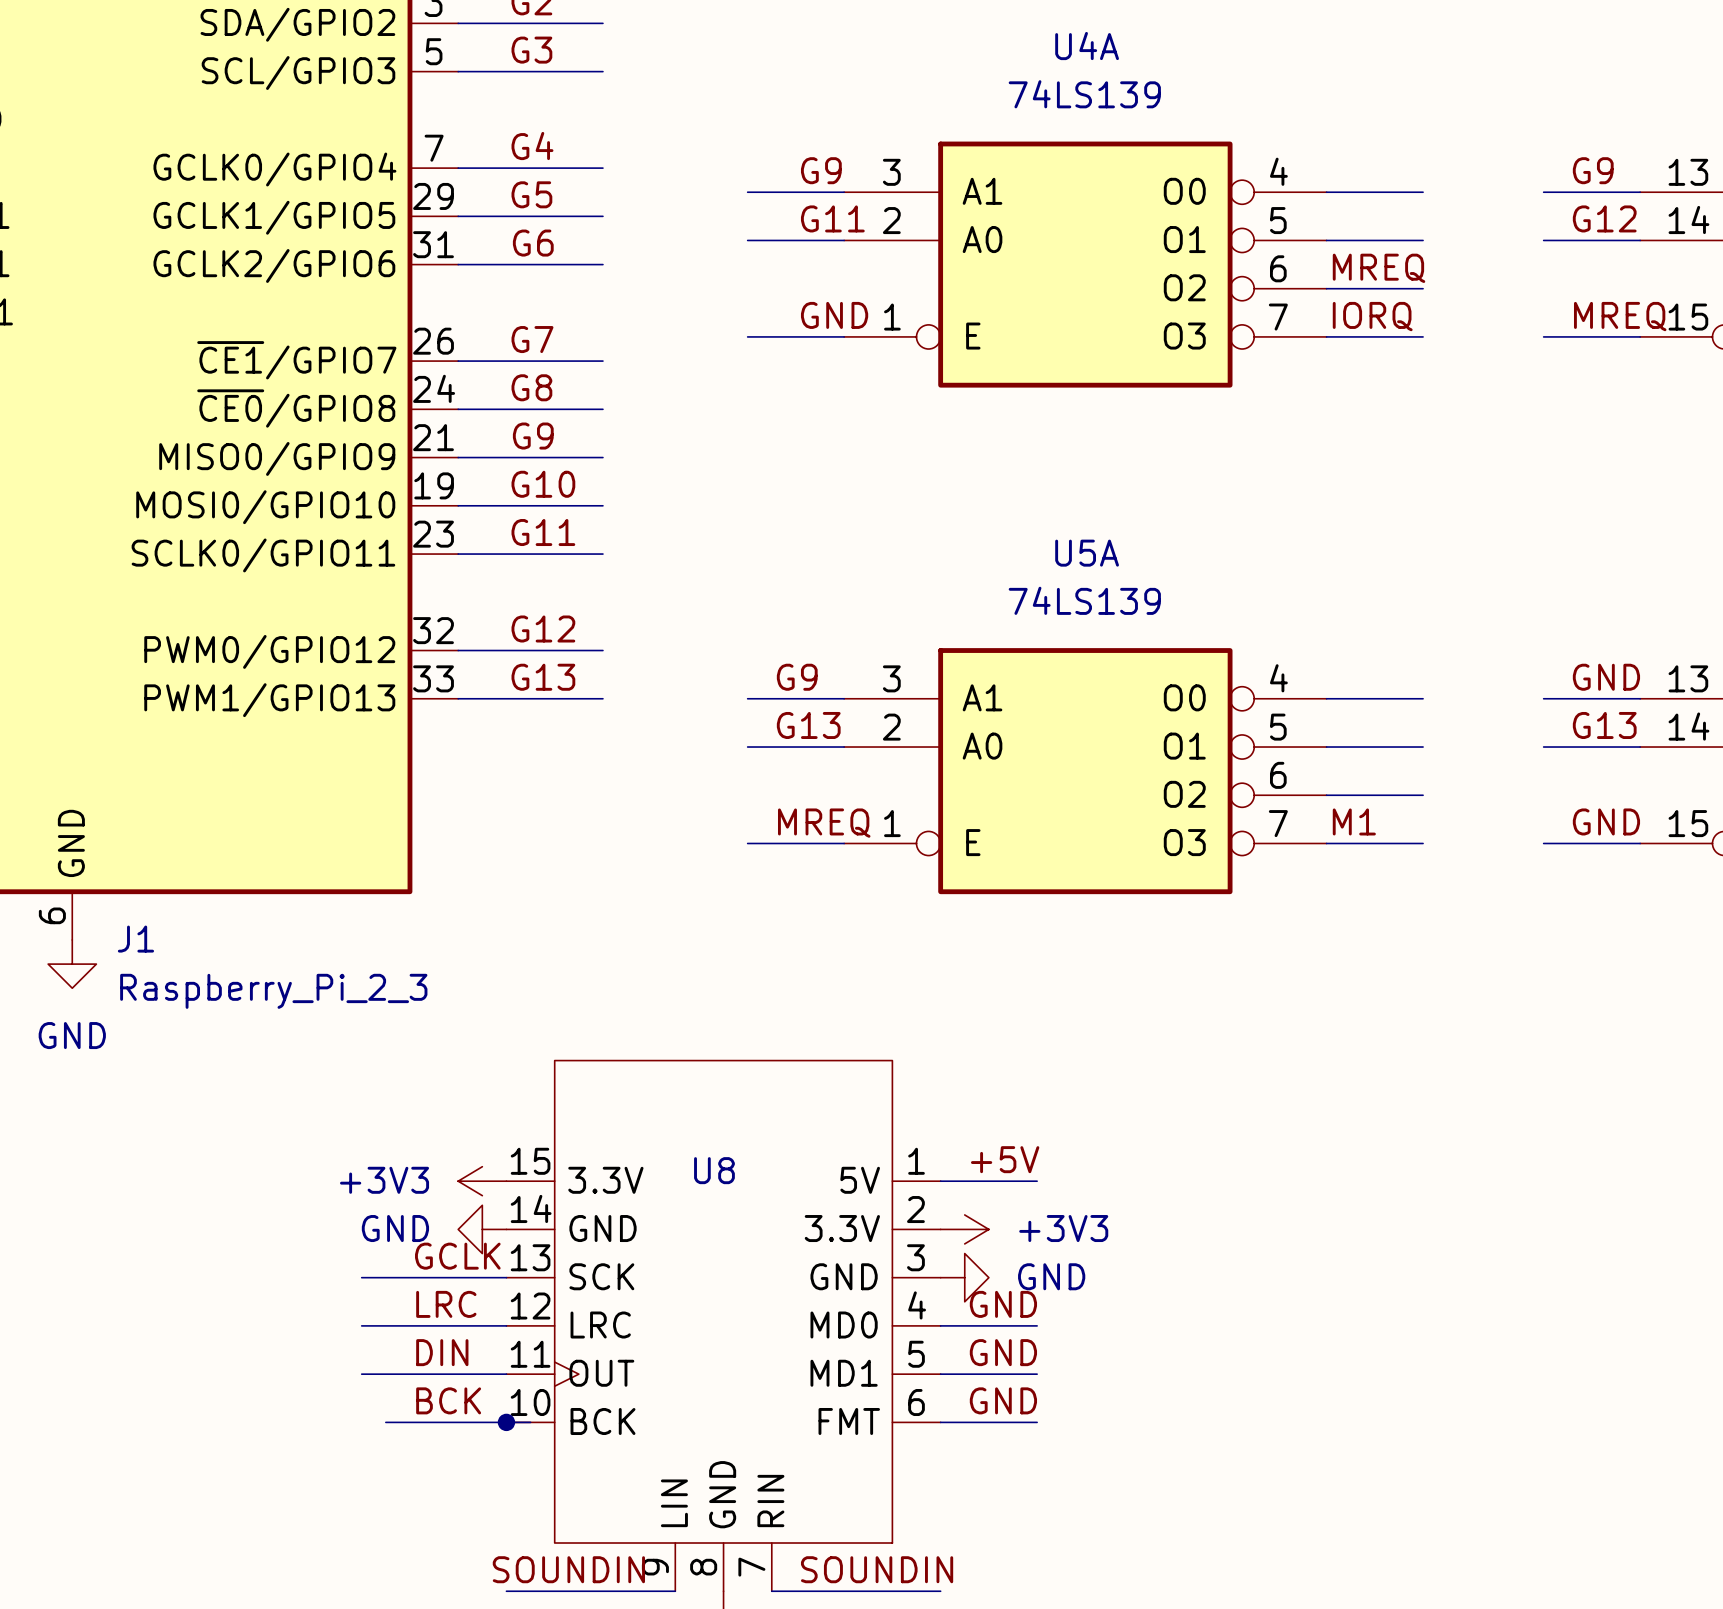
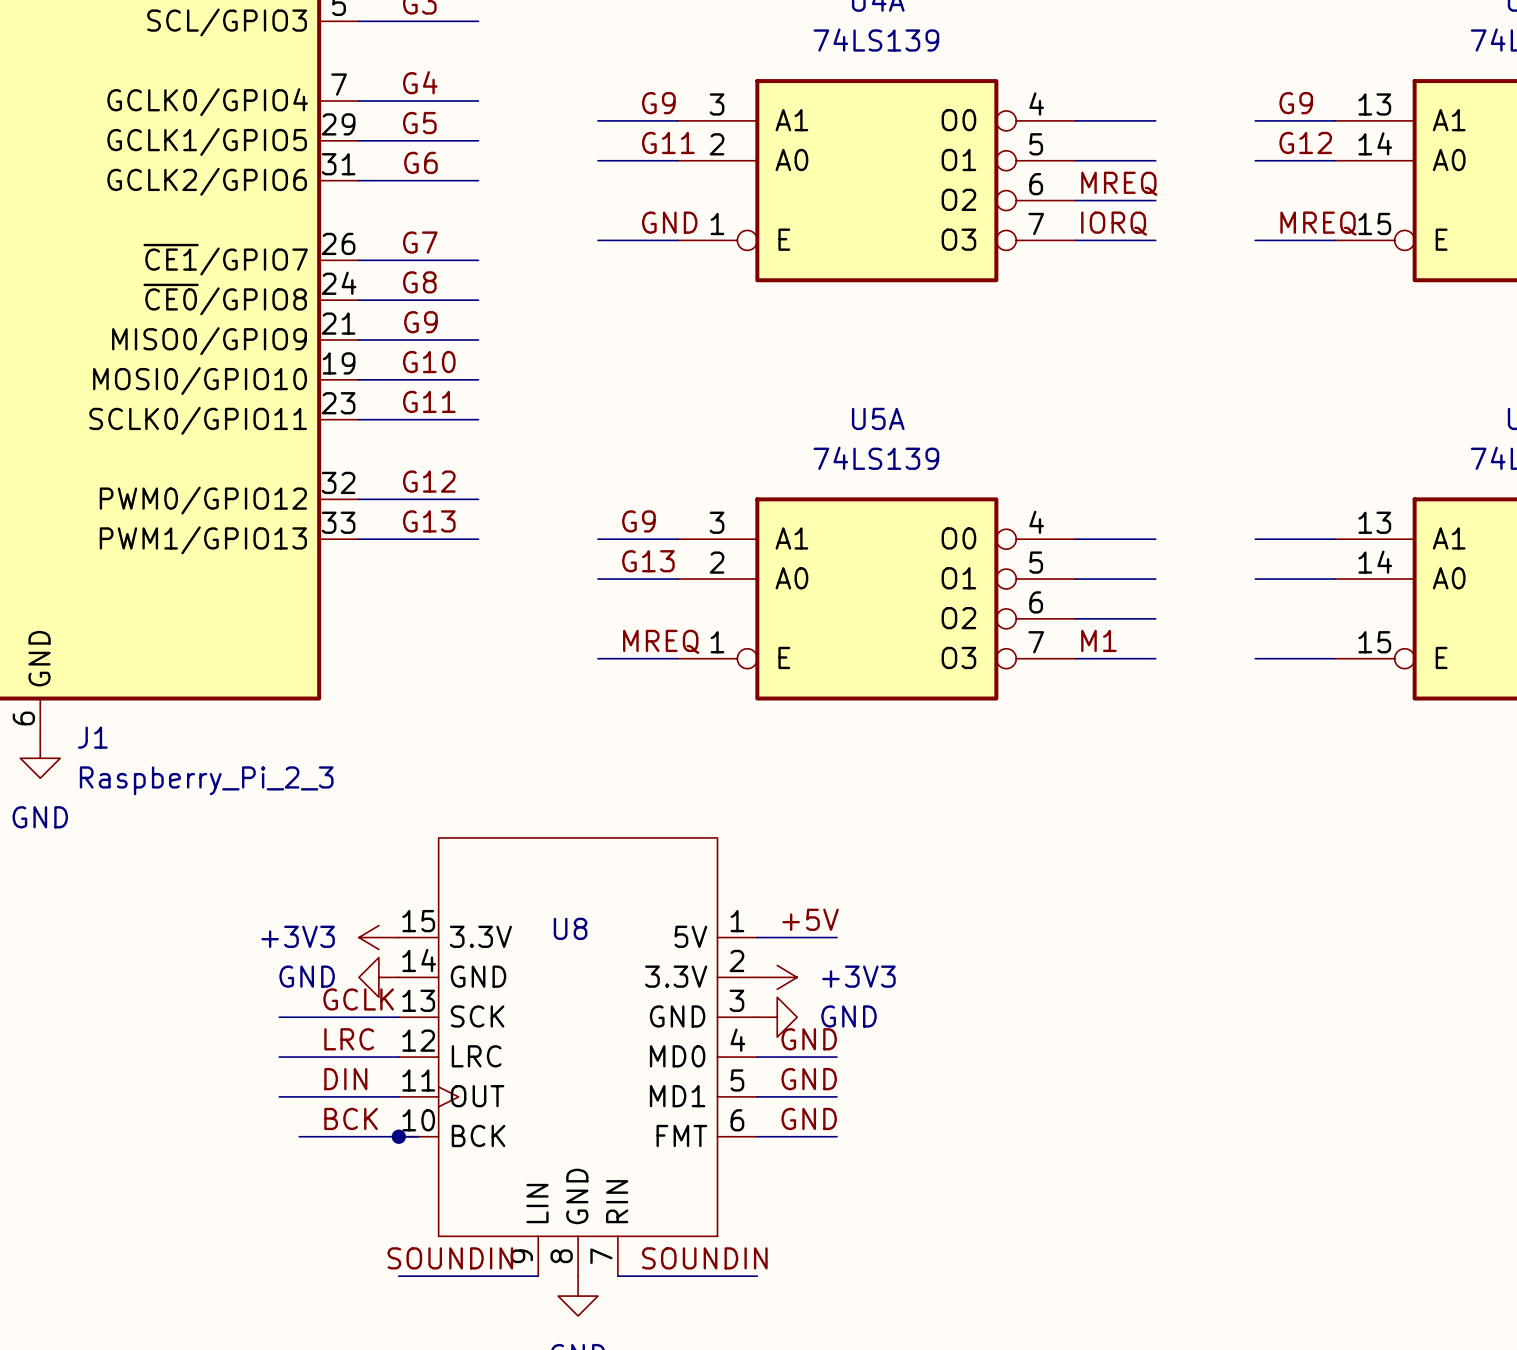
label: GND (1606, 677) -> none
label: G13 (1604, 725) -> none
label: GND (1606, 821) -> none

